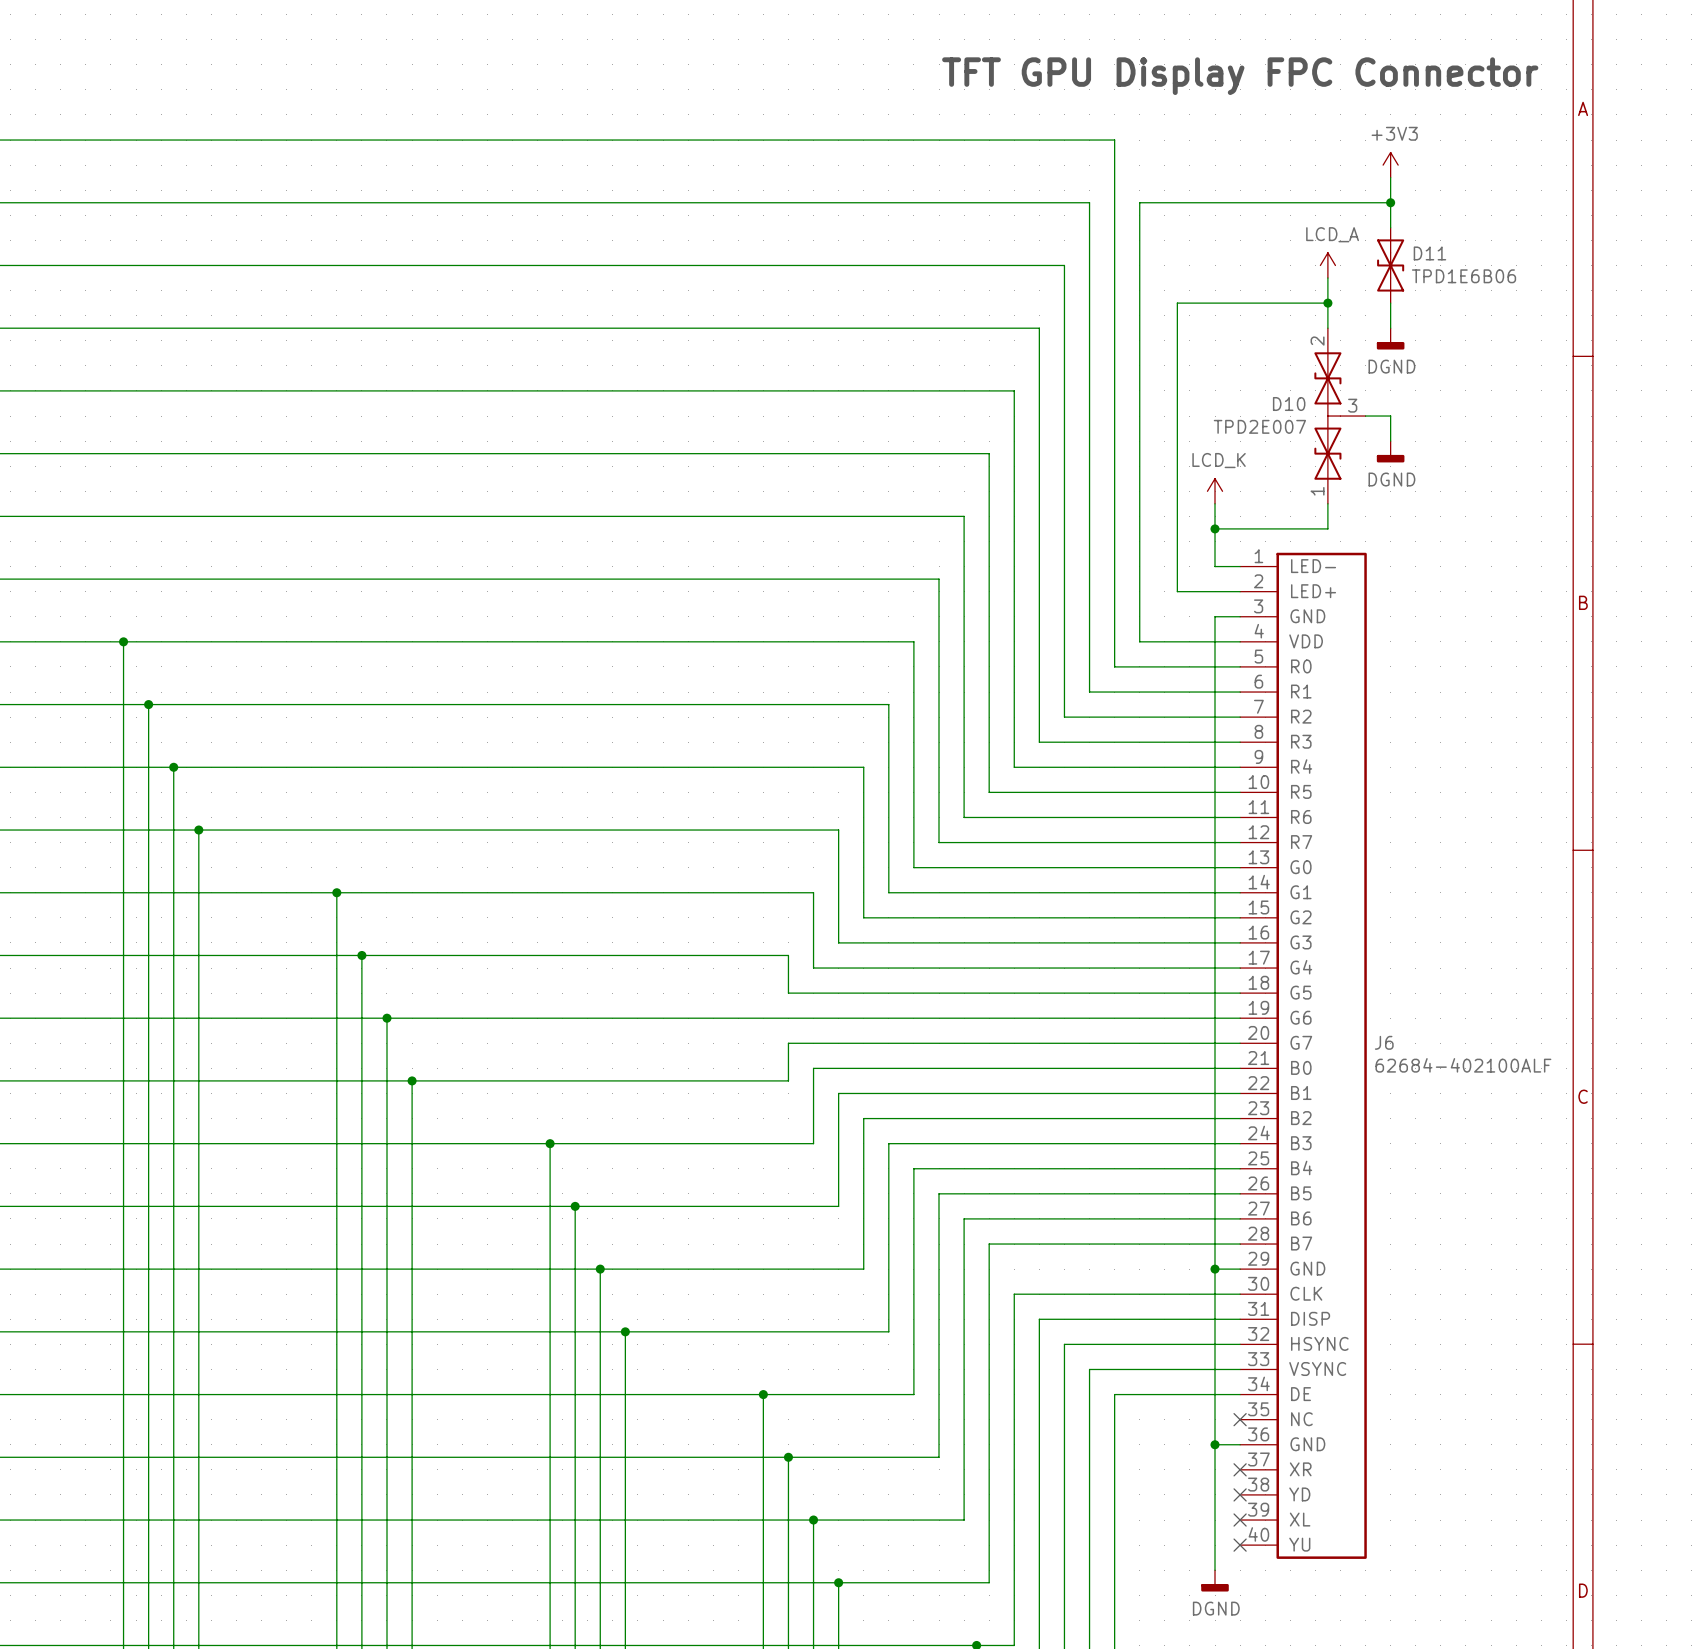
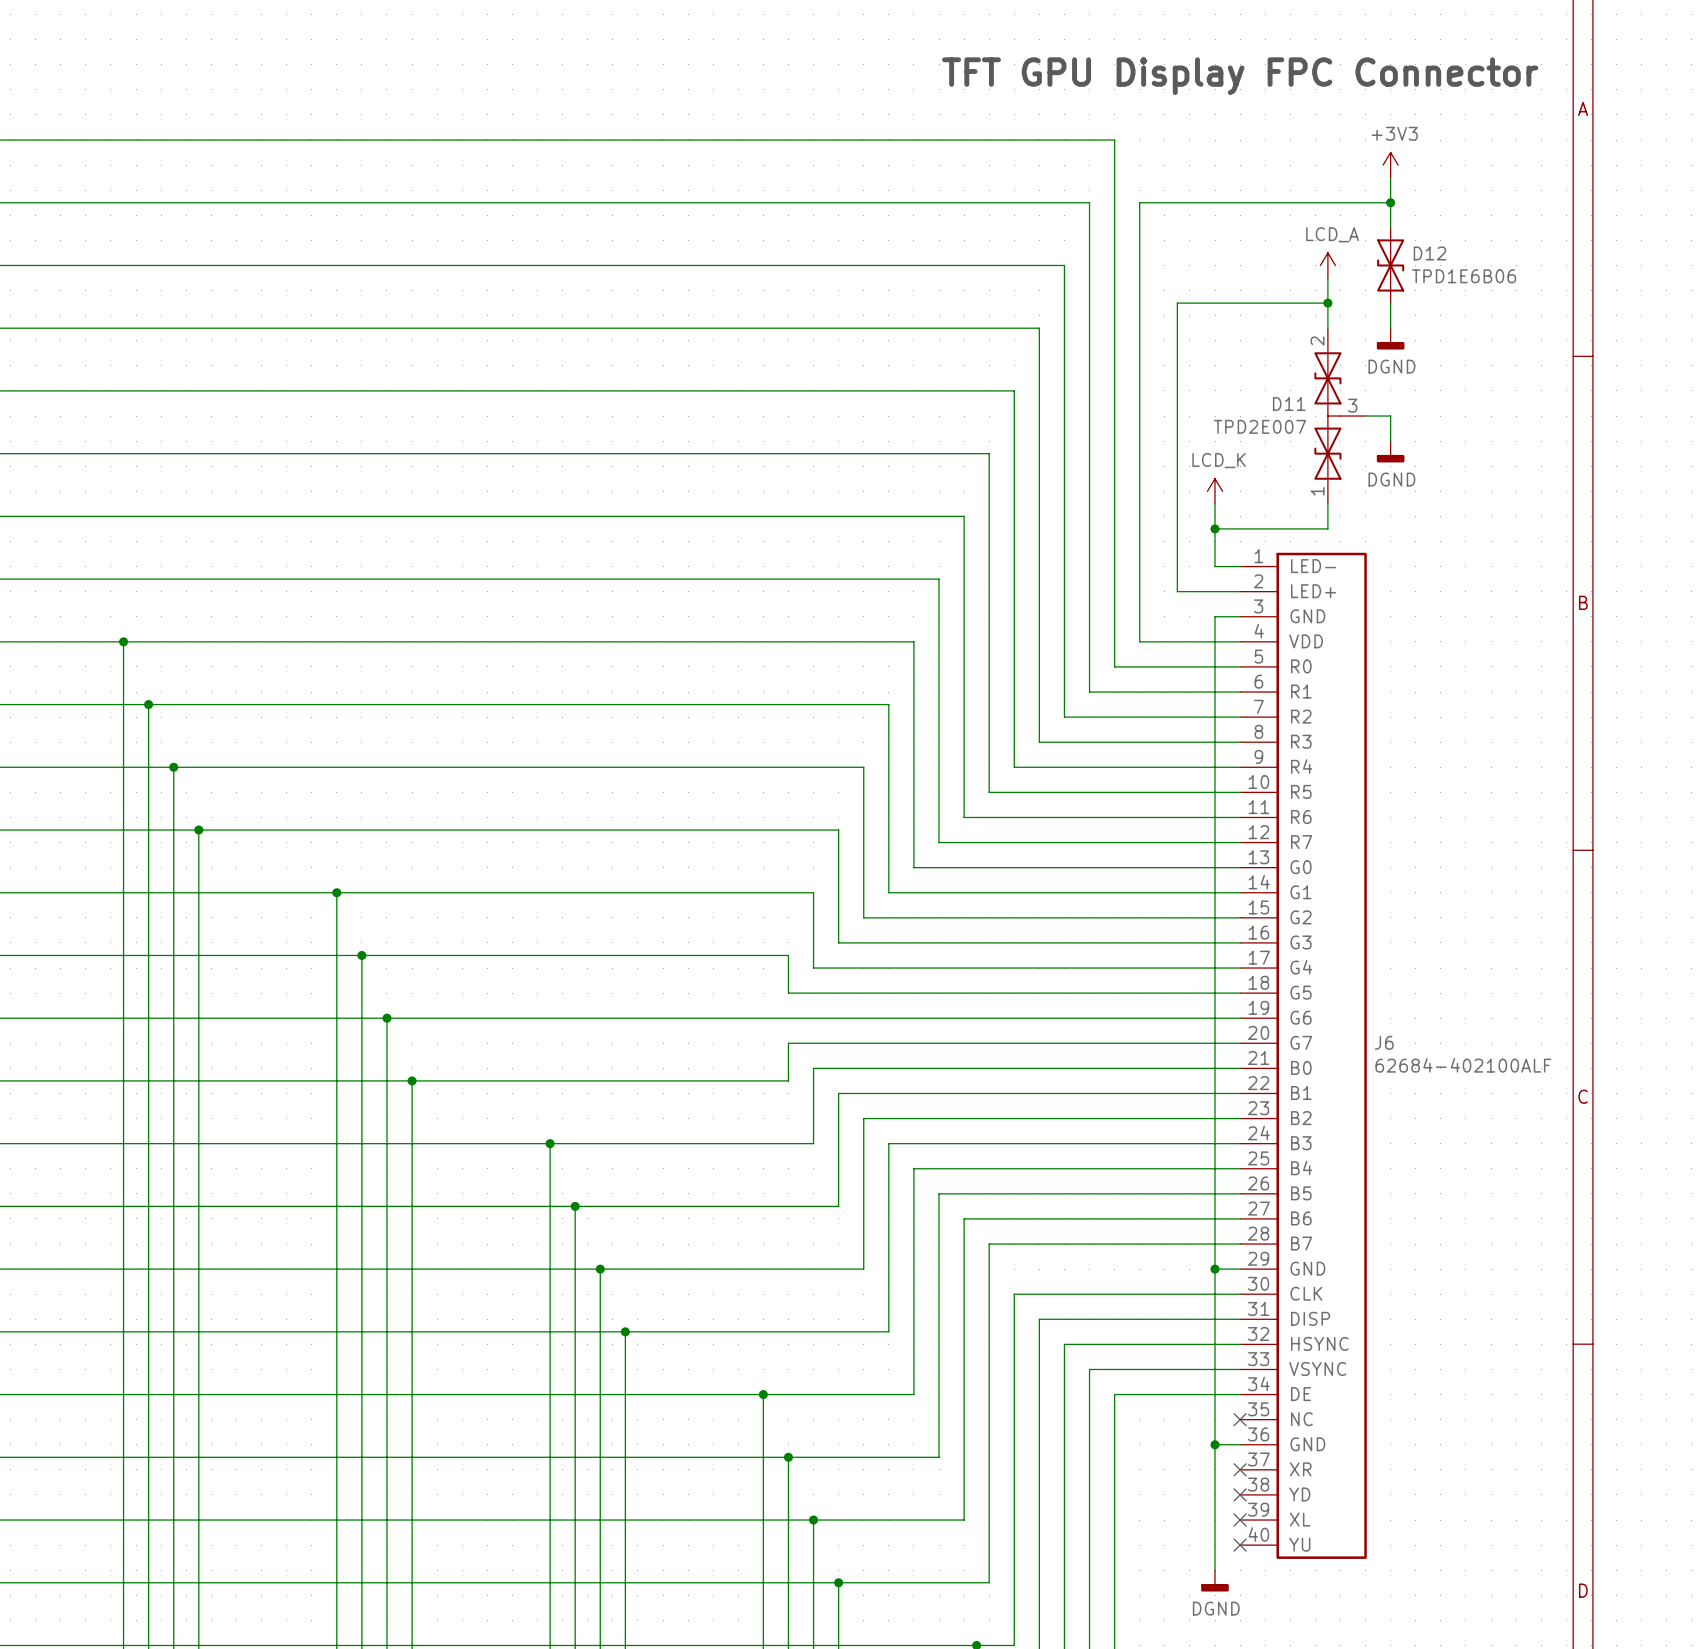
D11 name: D11 (1429, 253) -> D12 (1429, 253)
D10 name: D10 (1289, 404) -> D11 (1289, 404)

